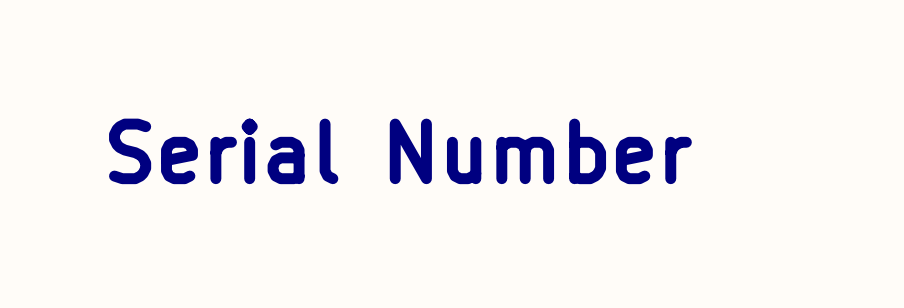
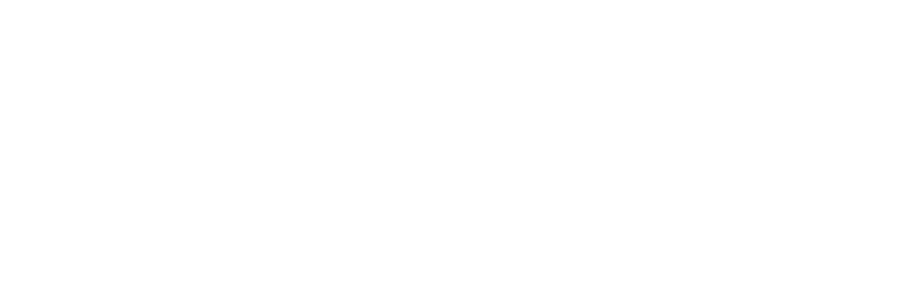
text: Serial Number (400, 151) -> none

